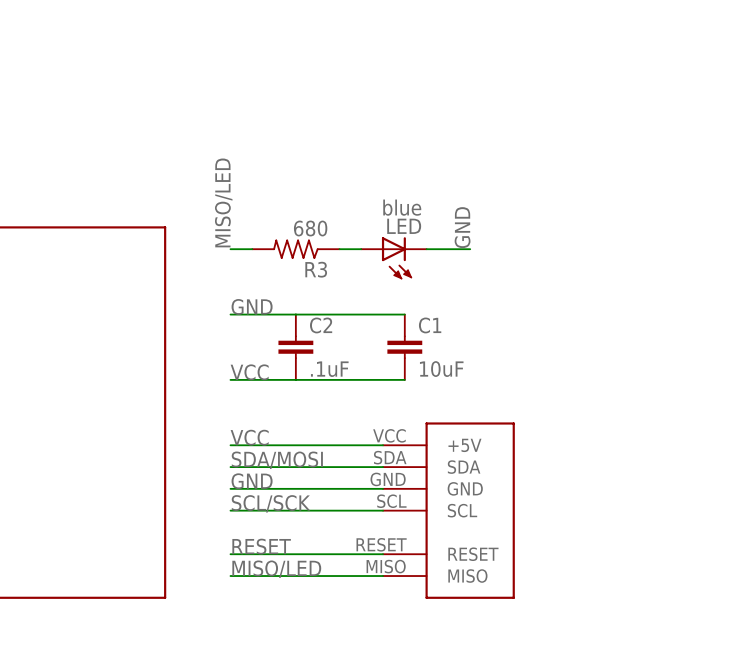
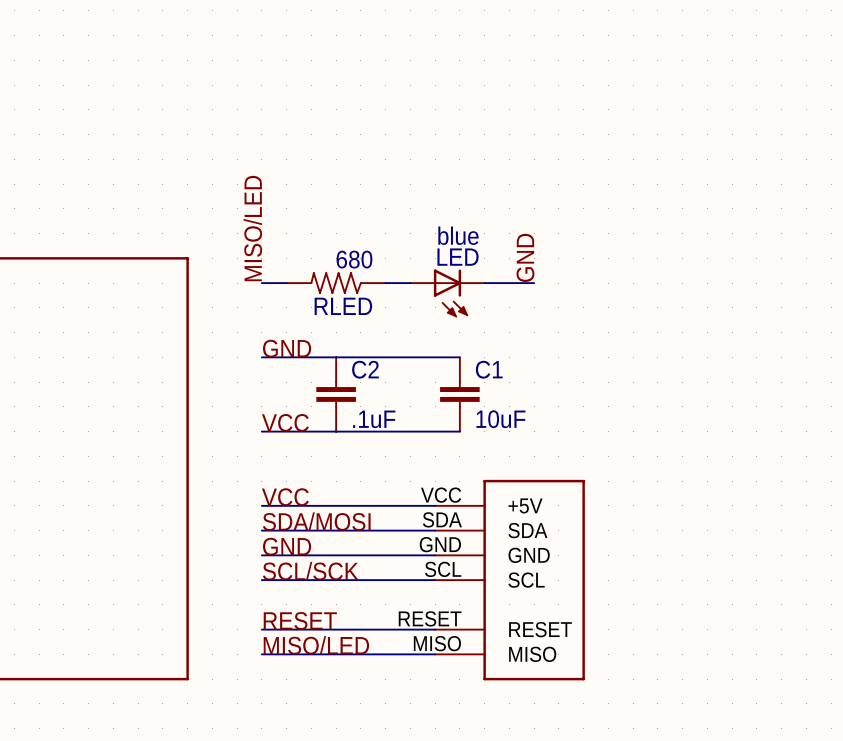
R3 name: R3 (316, 269) -> RLED (343, 306)

